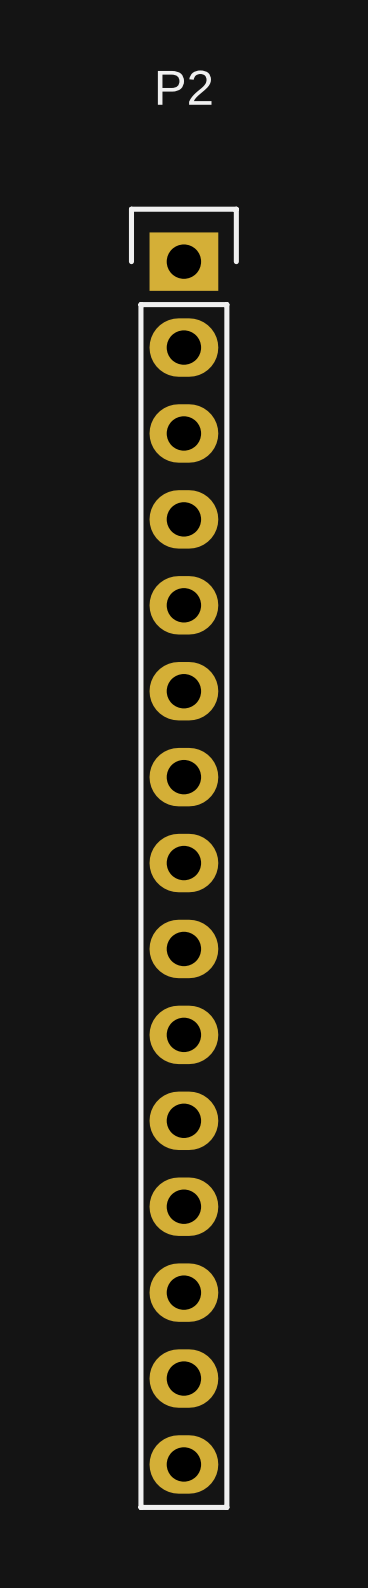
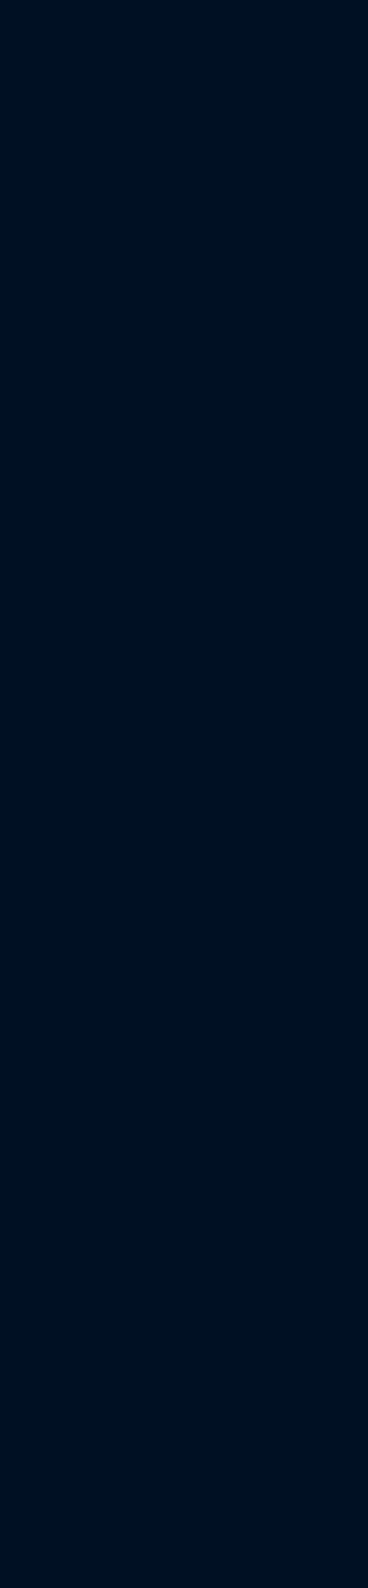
P2: (183, 858) -> none

